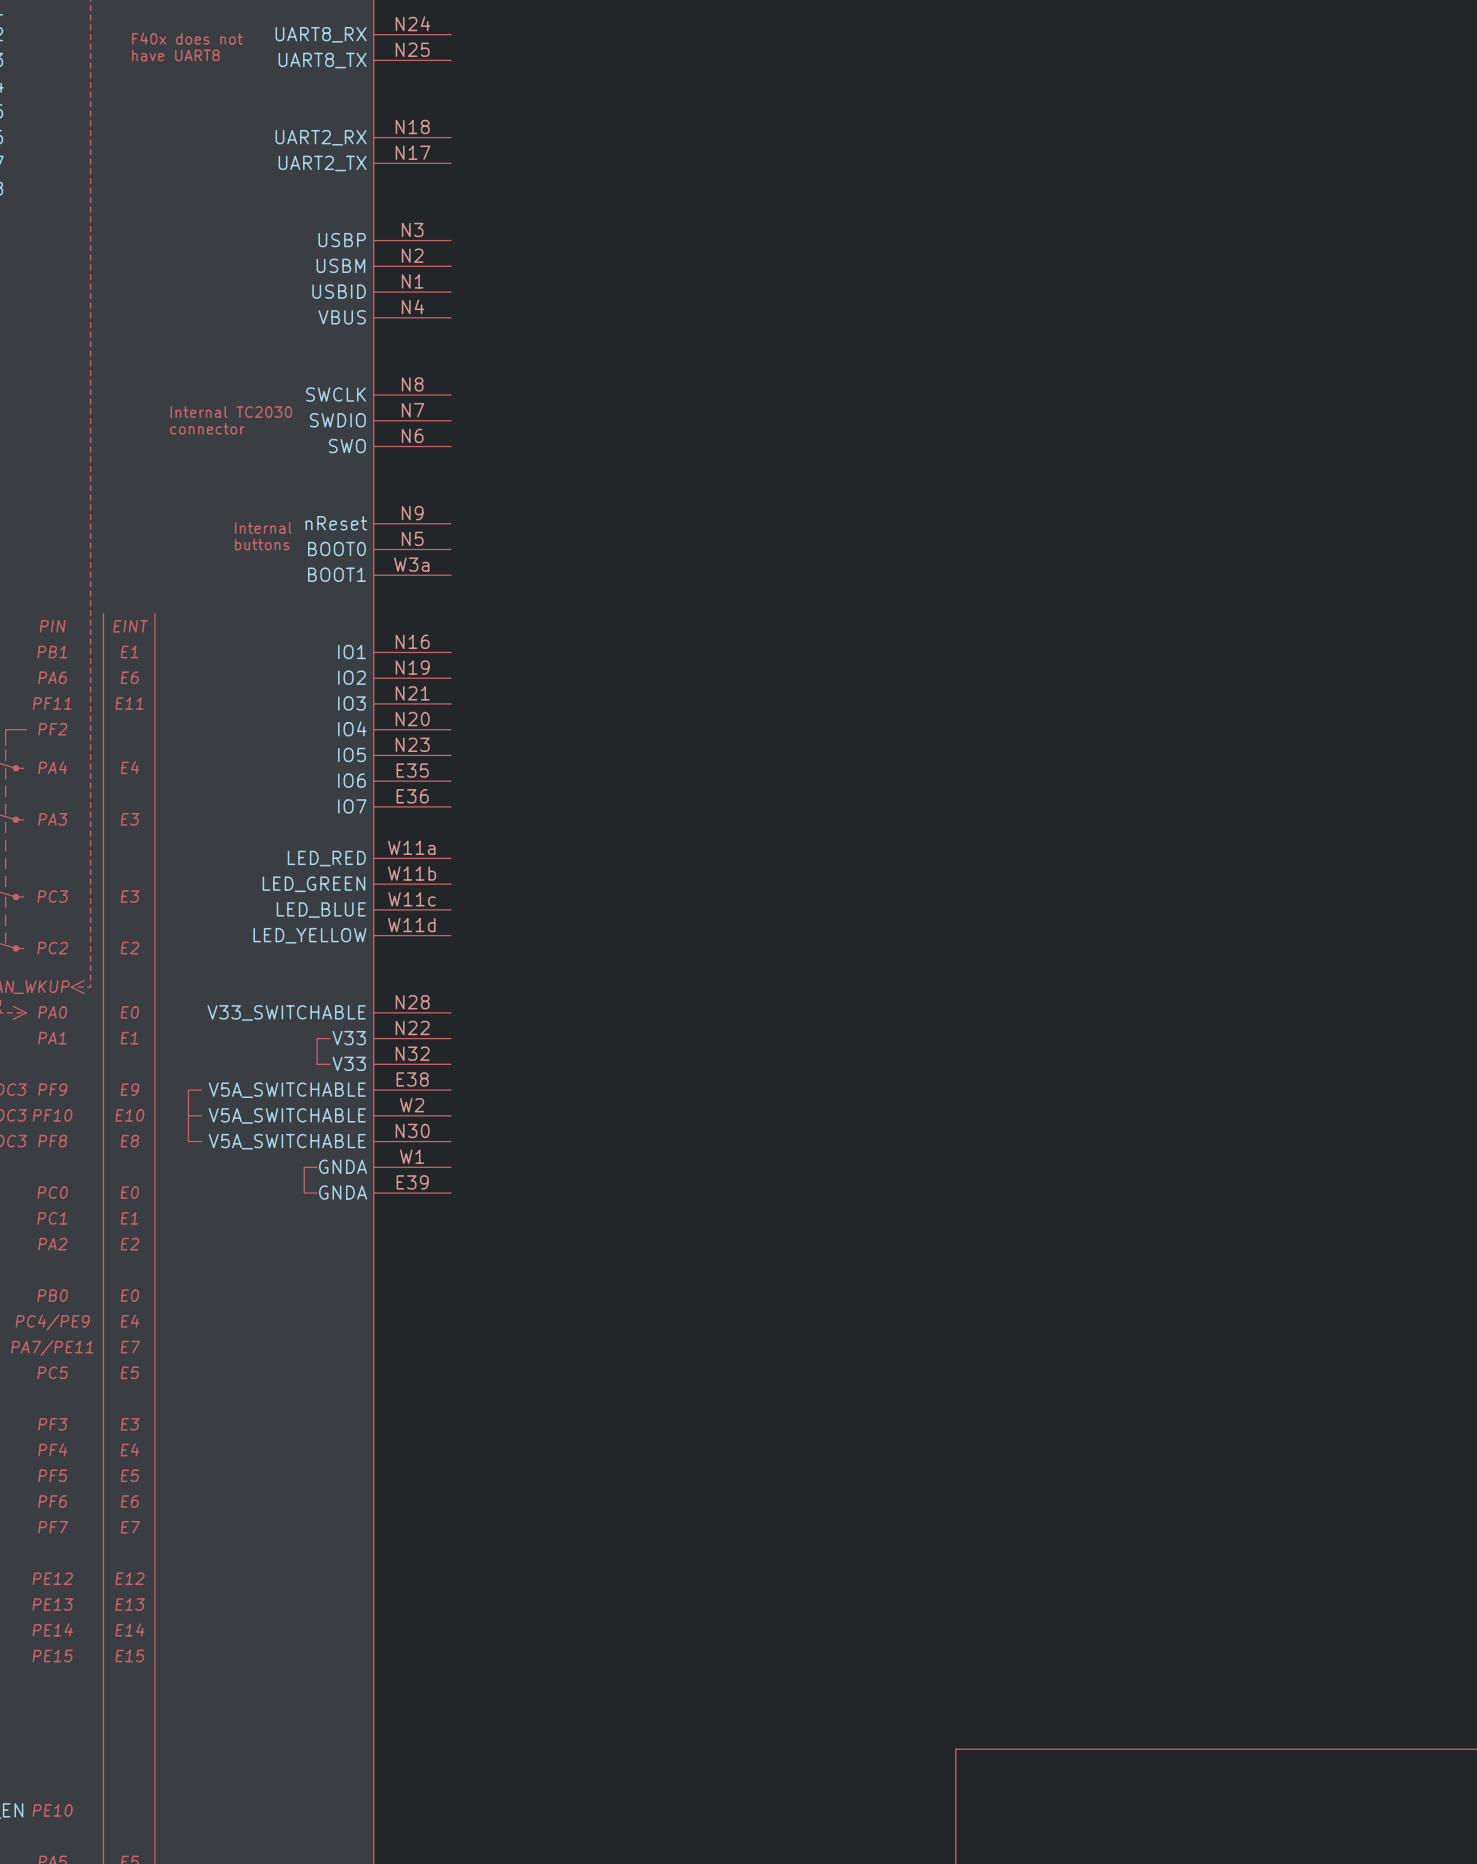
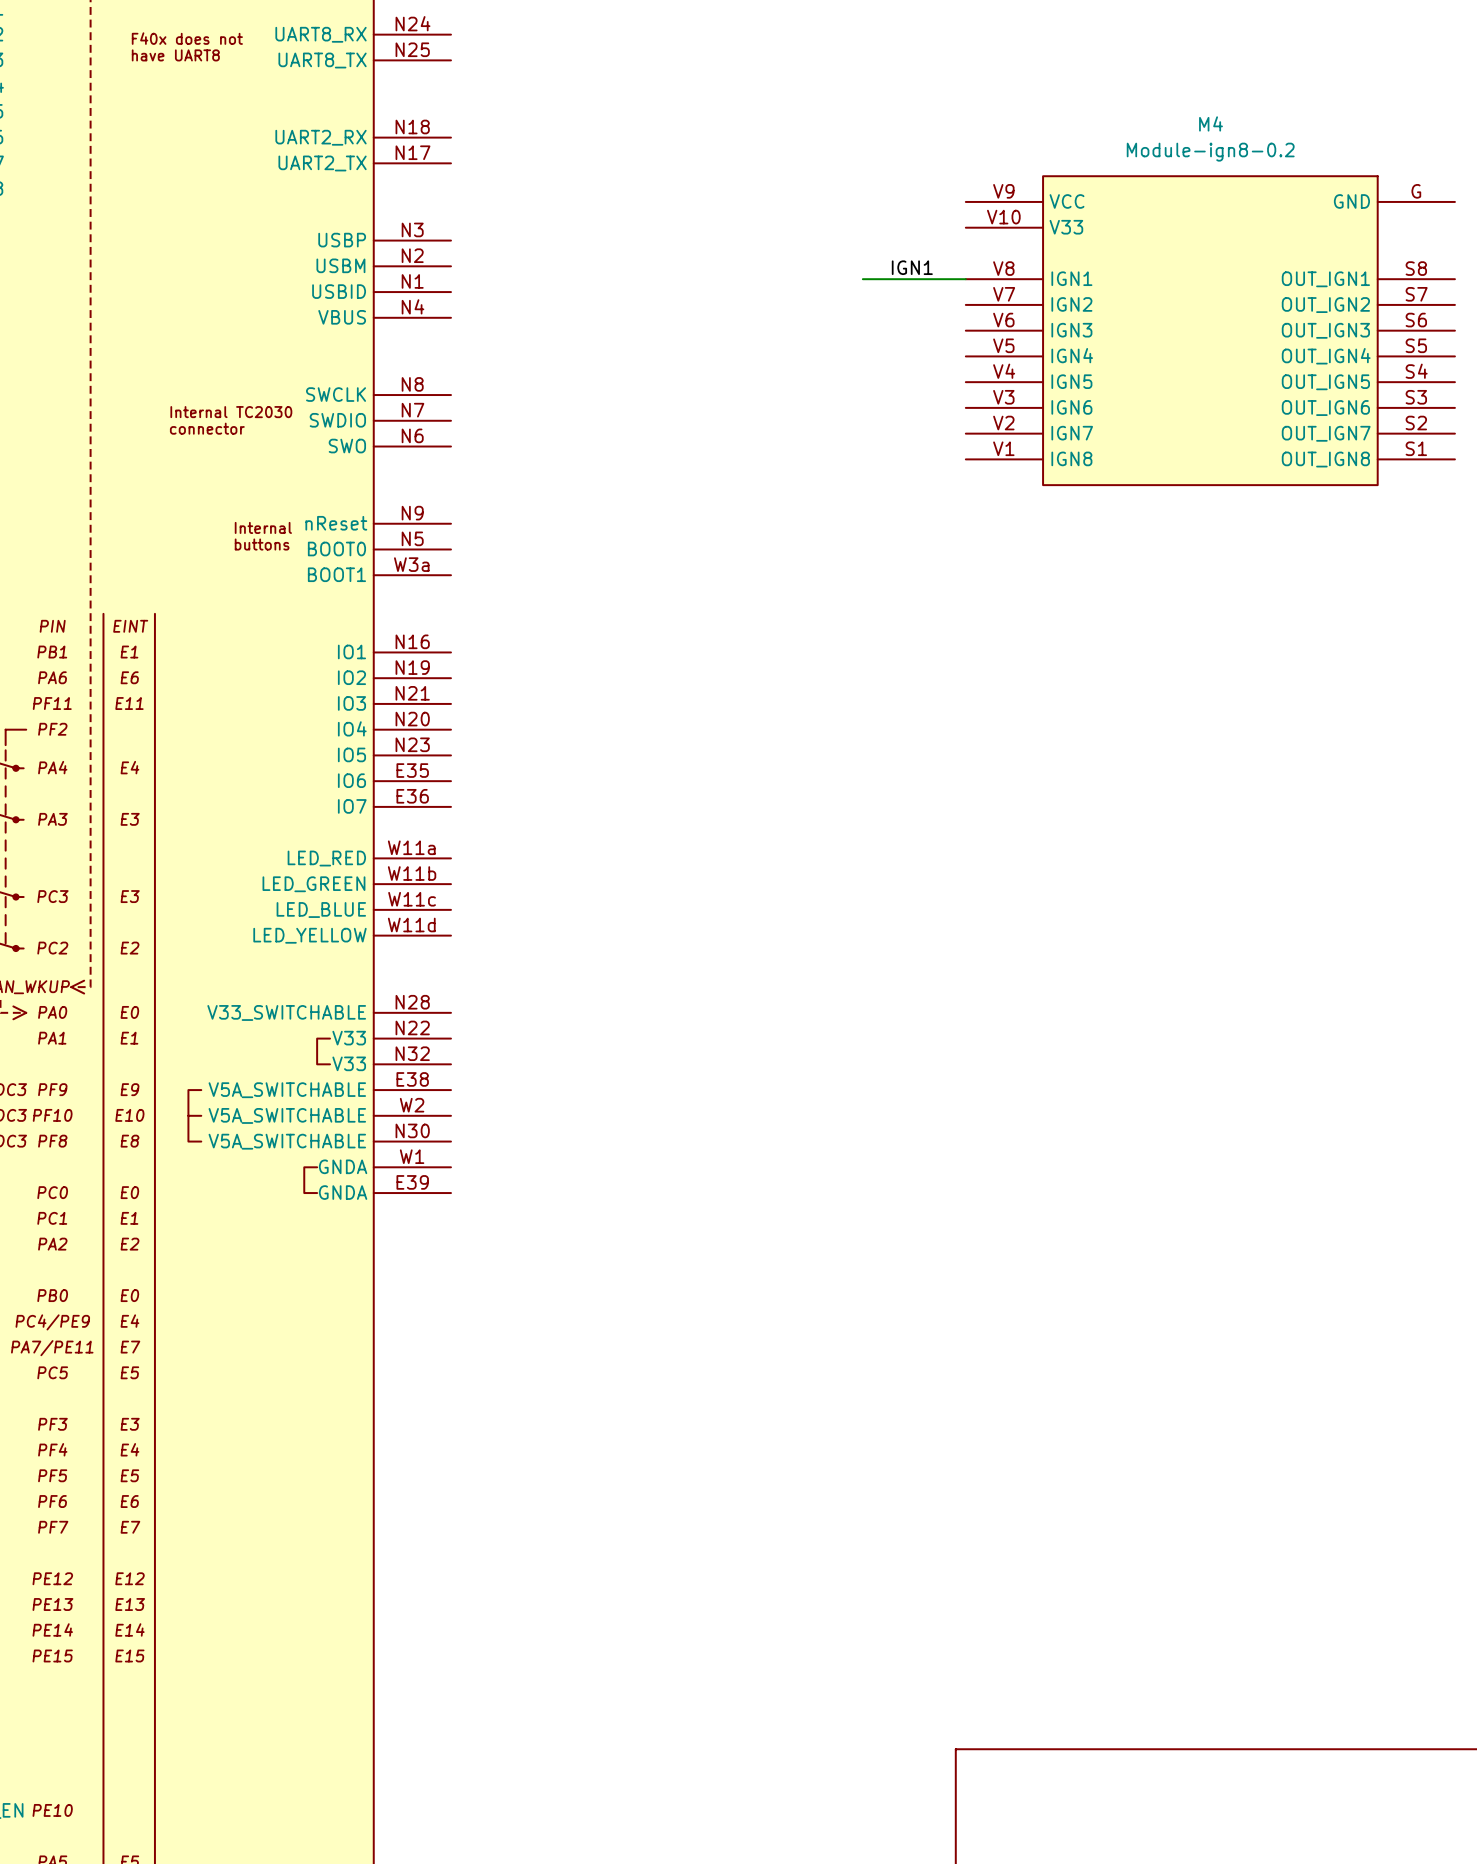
label: none -> IGN1 (912, 267)
wire: none -> (862, 279) (965, 279)
M4: none -> Module-ign8-0.2 (1210, 330)

